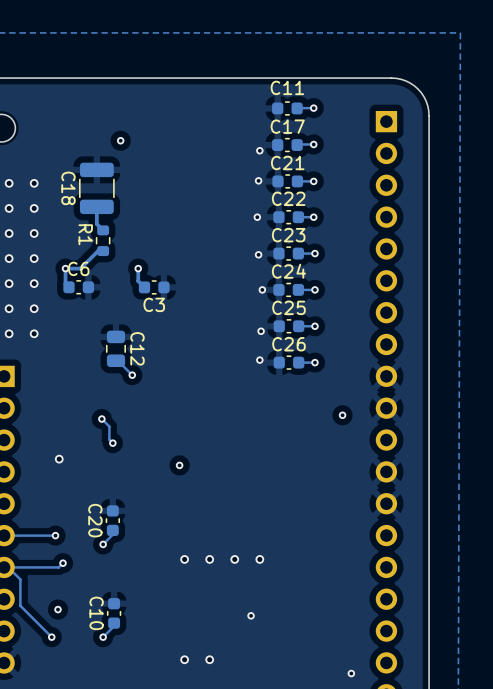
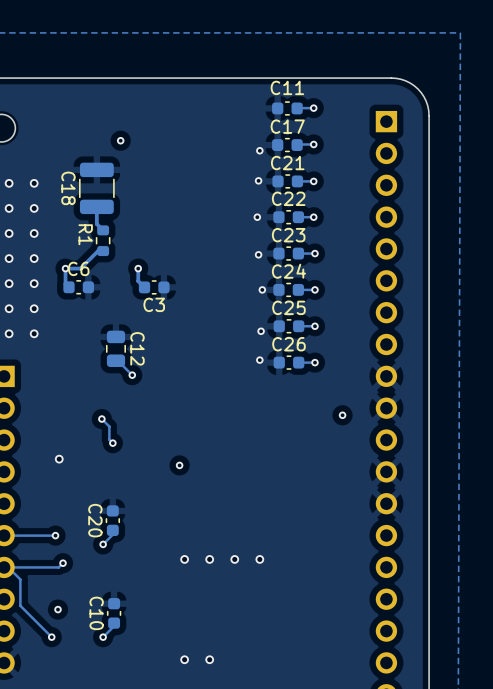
via: (251, 615) -> none
via: (351, 673) -> none

